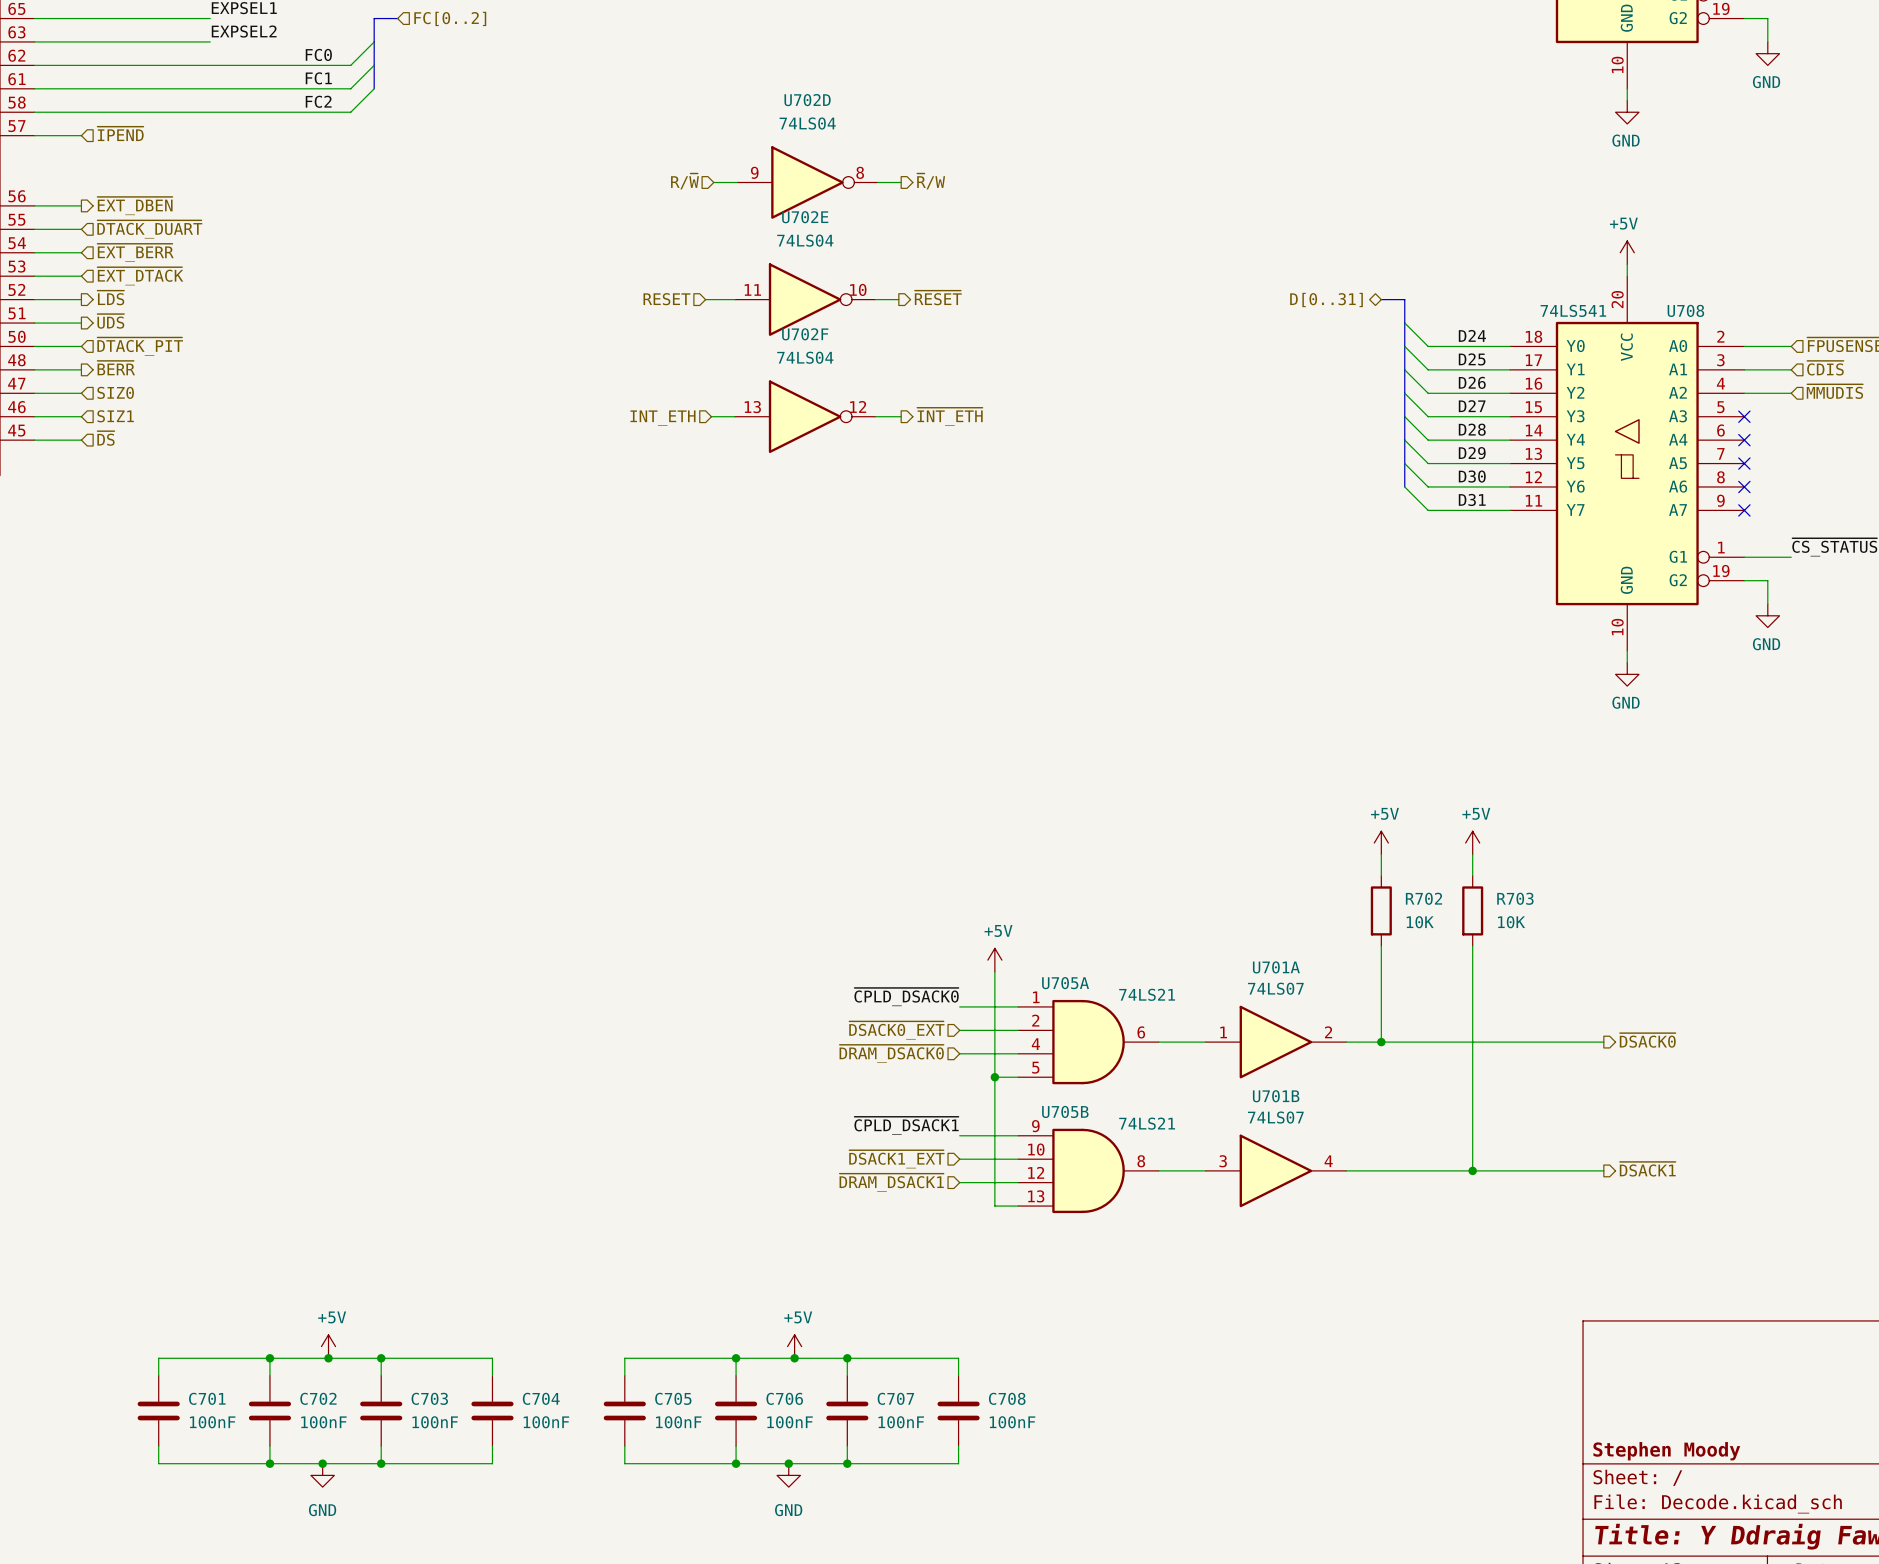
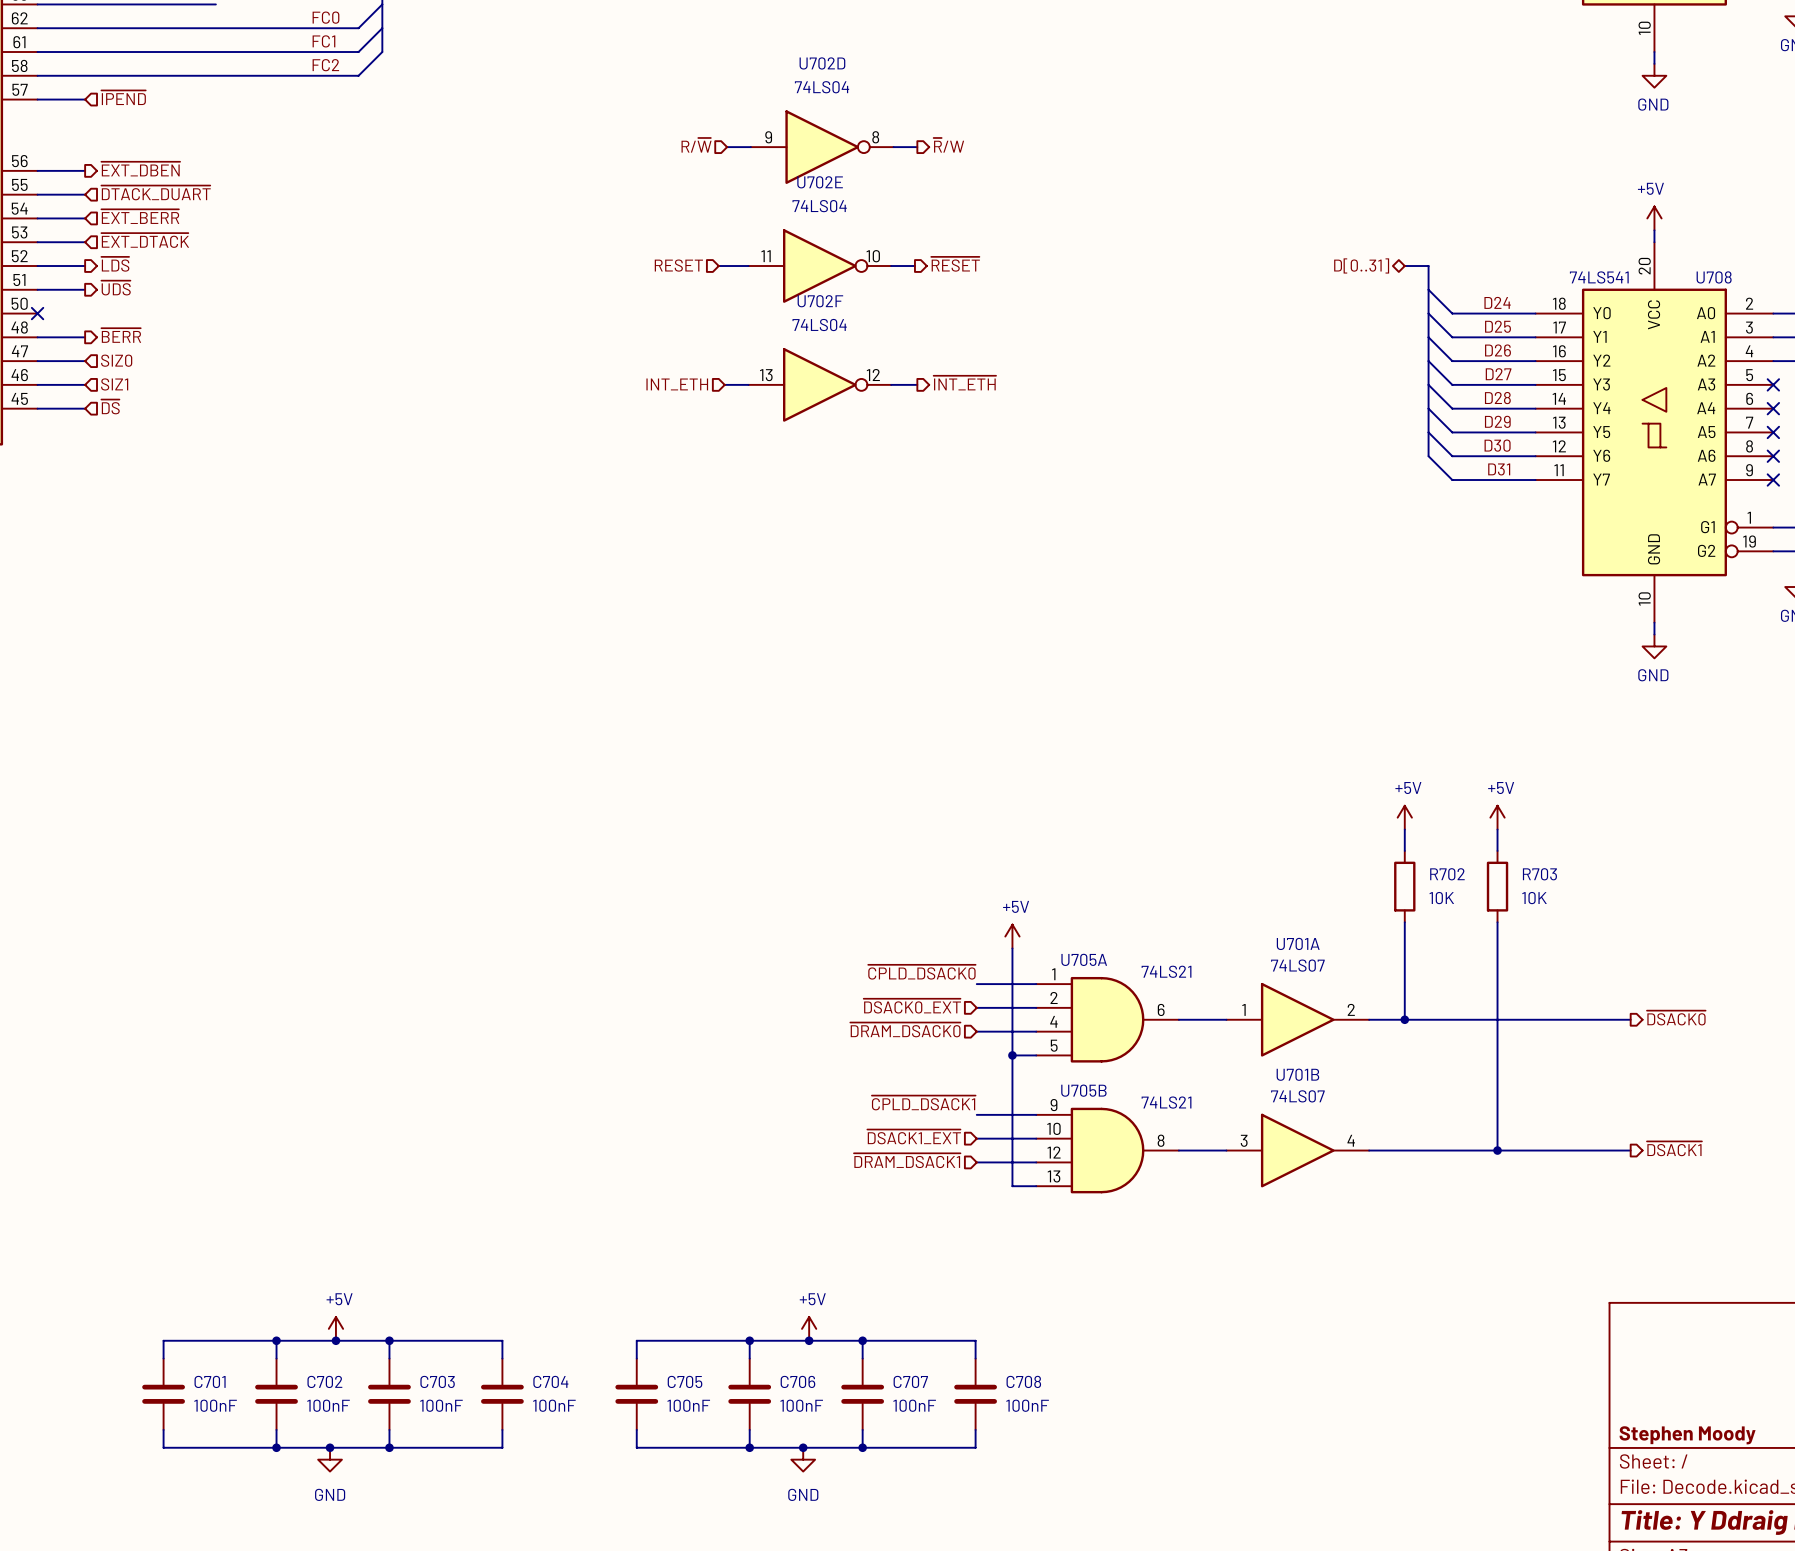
wire: (34, 346) (81, 346) -> none
no-connect mark: none -> (37, 313)
hierarchical label: ~{DTACK_PIT} (140, 346) -> none

